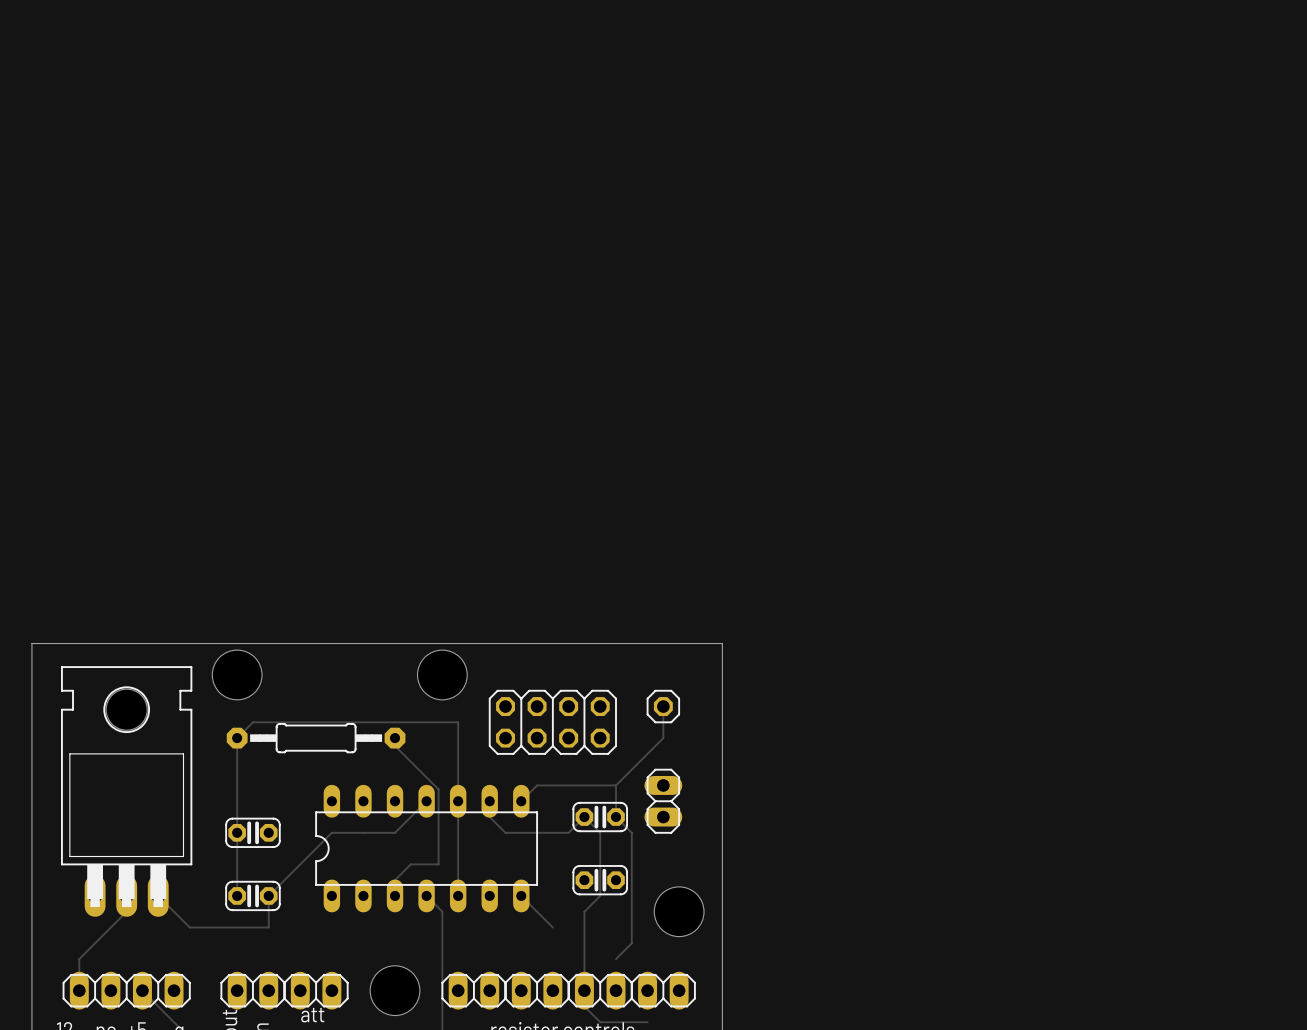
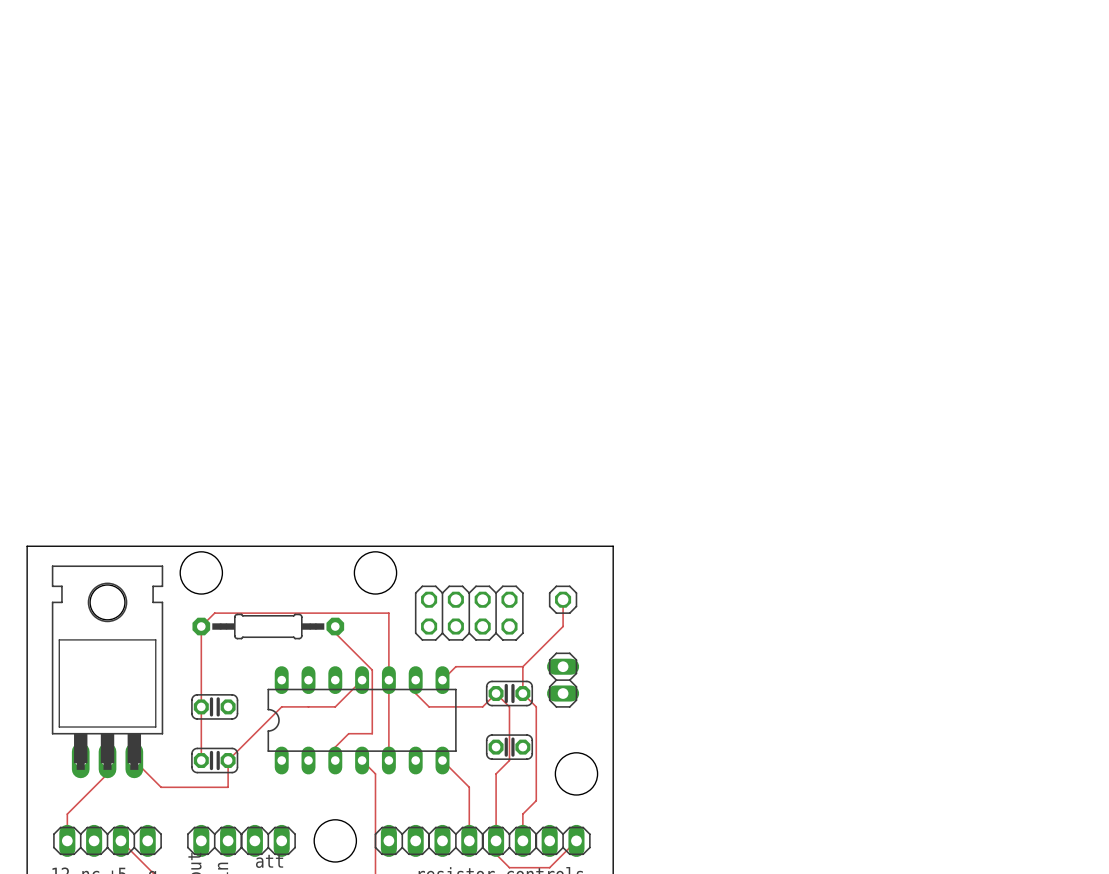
track: none -> (469, 787) (469, 840)
track: none -> (522, 814) (522, 840)
track: none -> (576, 840) (549, 867)

